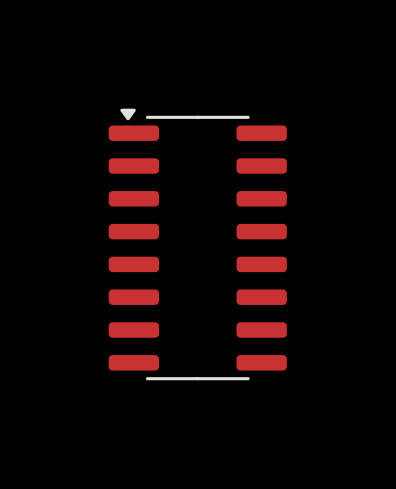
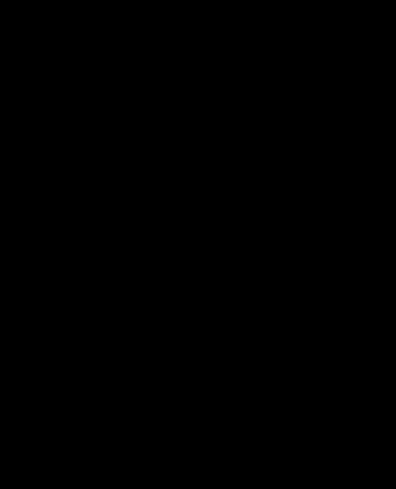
part: (197, 244) -> none

